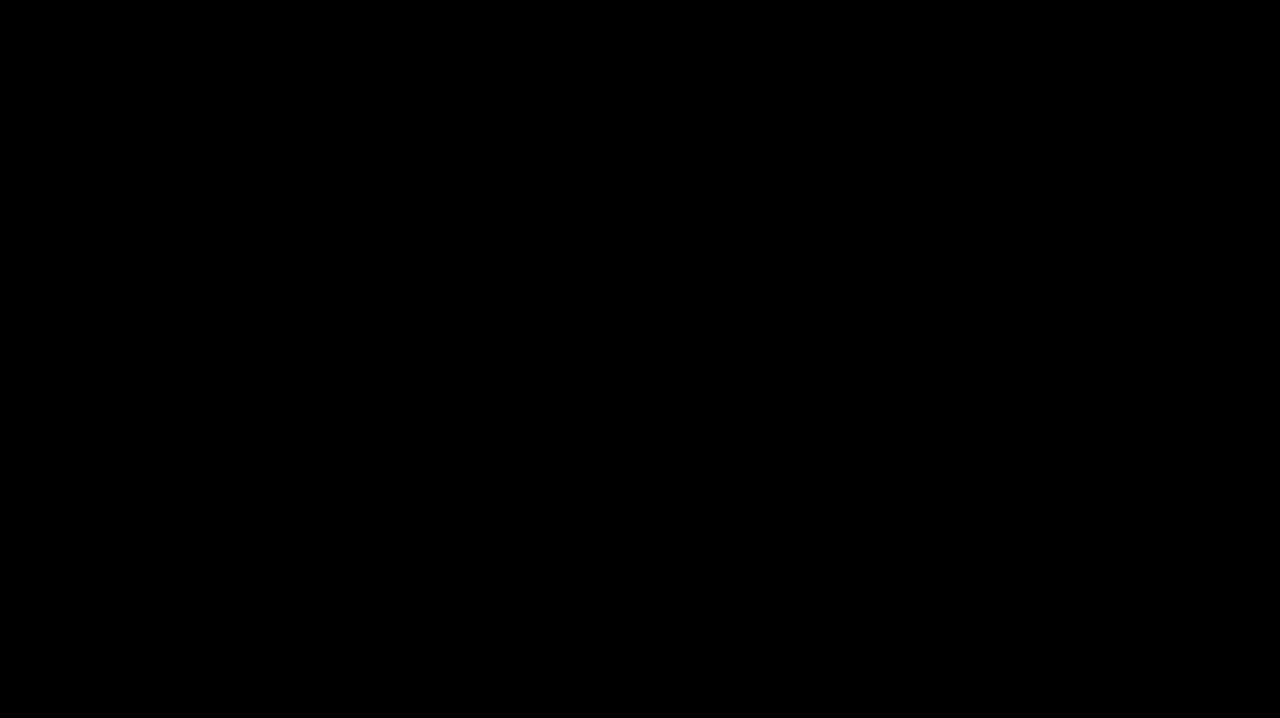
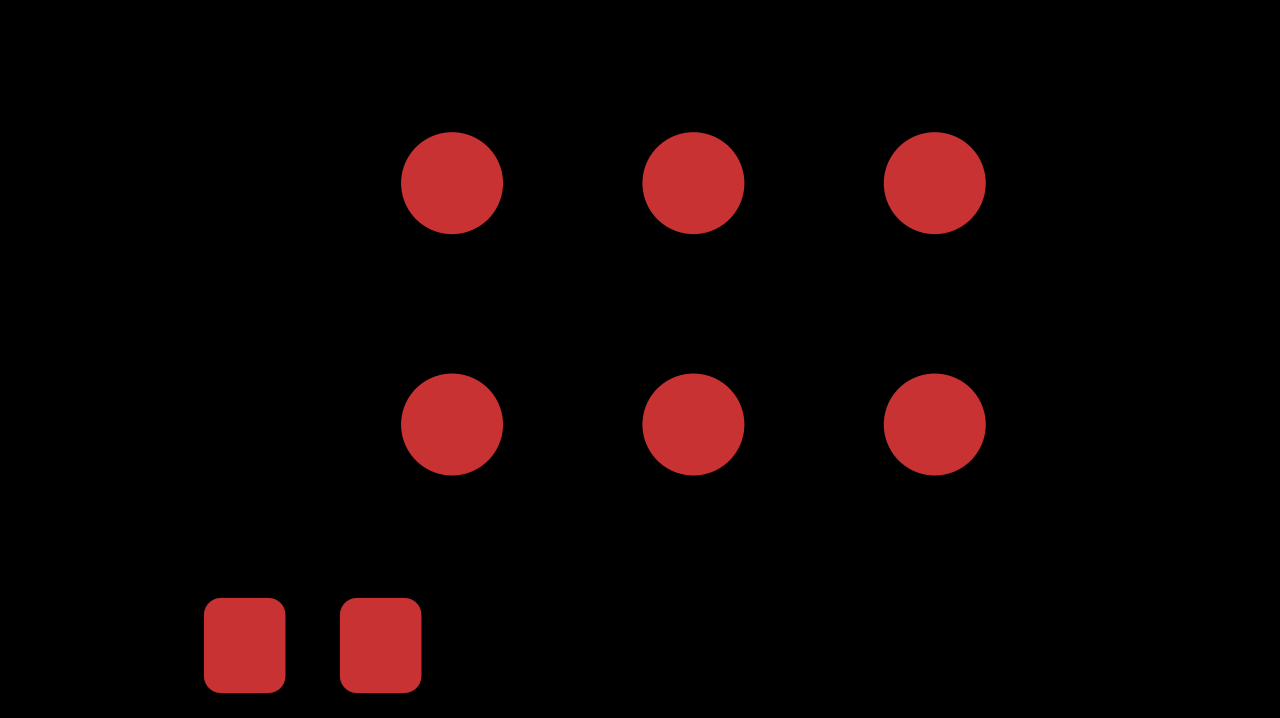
part: none -> (452, 183)
part: none -> (693, 183)
part: none -> (934, 183)
part: none -> (452, 424)
part: none -> (693, 424)
part: none -> (934, 424)
part: none -> (312, 645)

